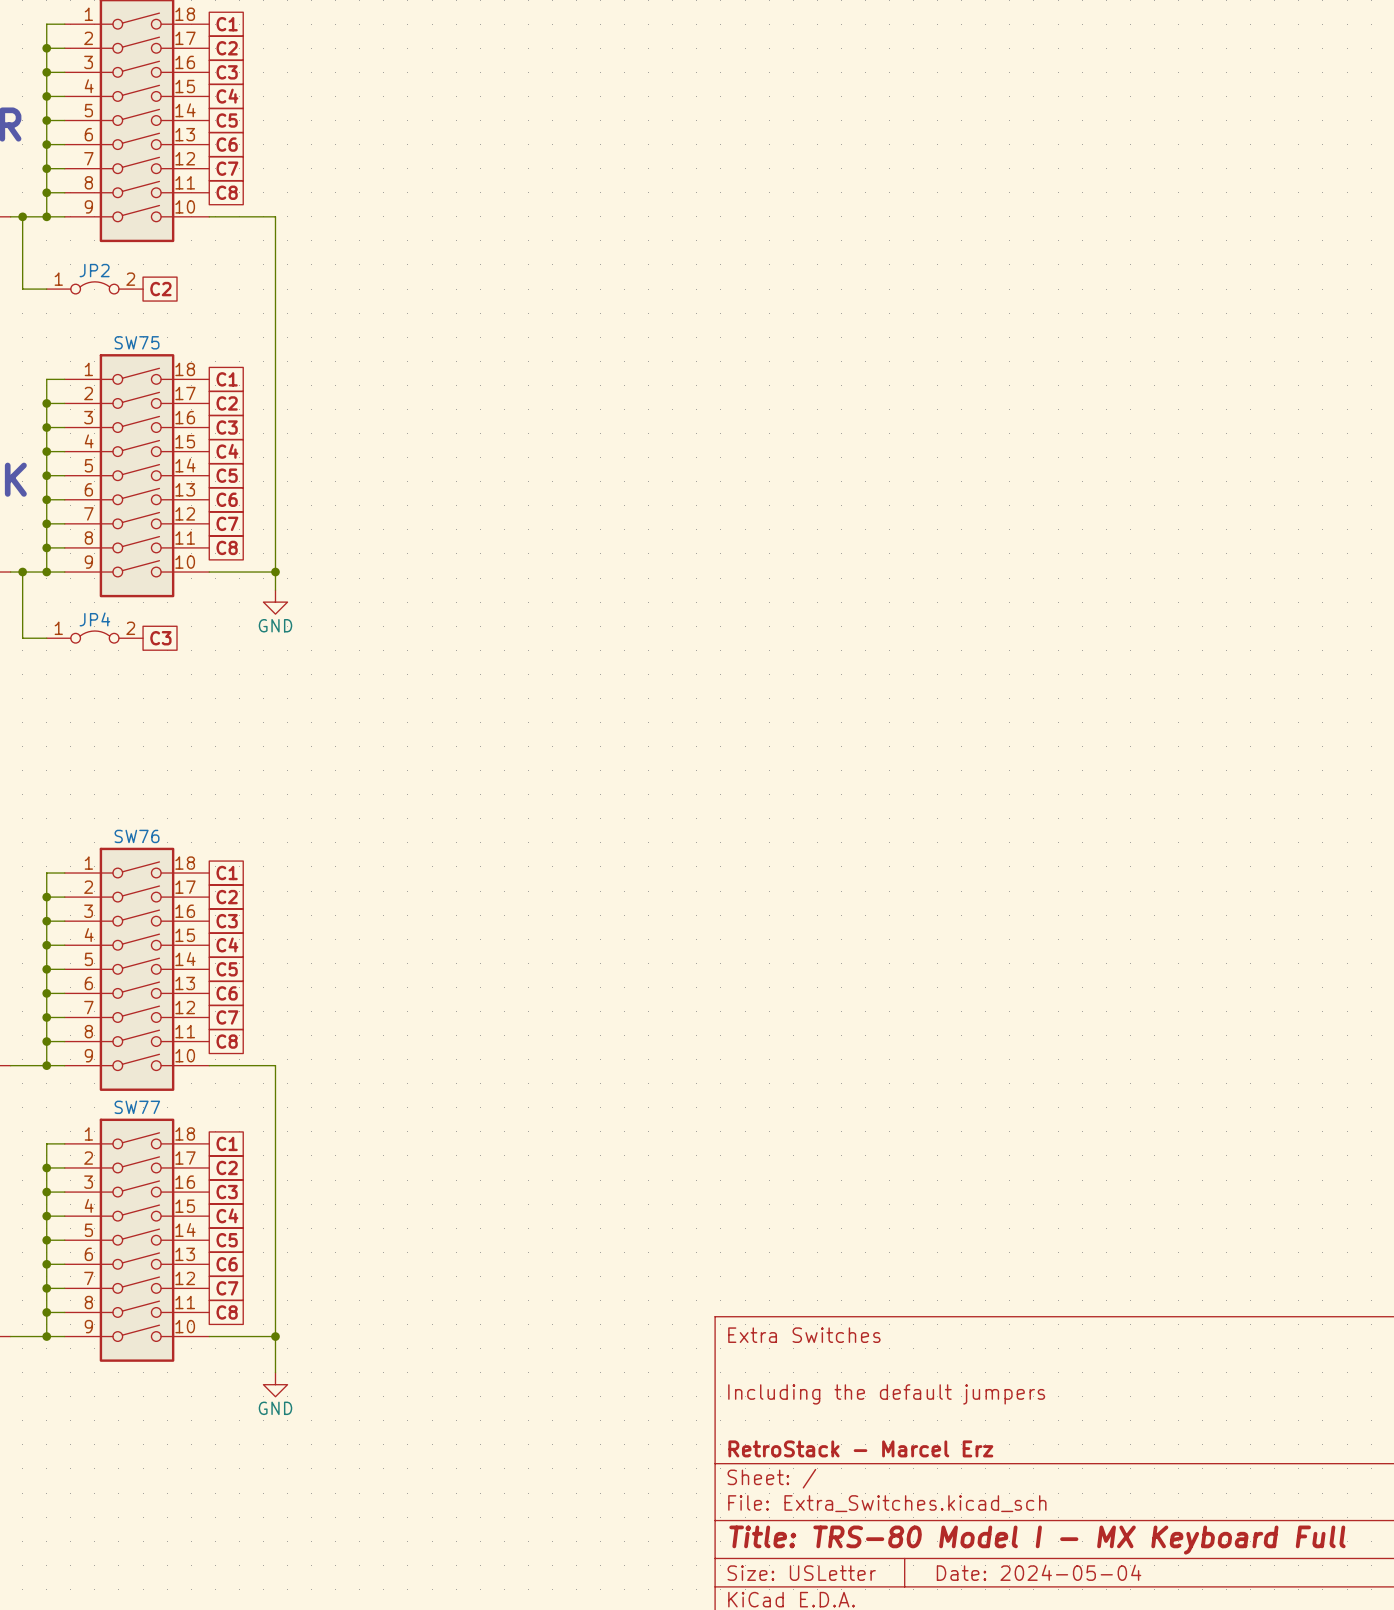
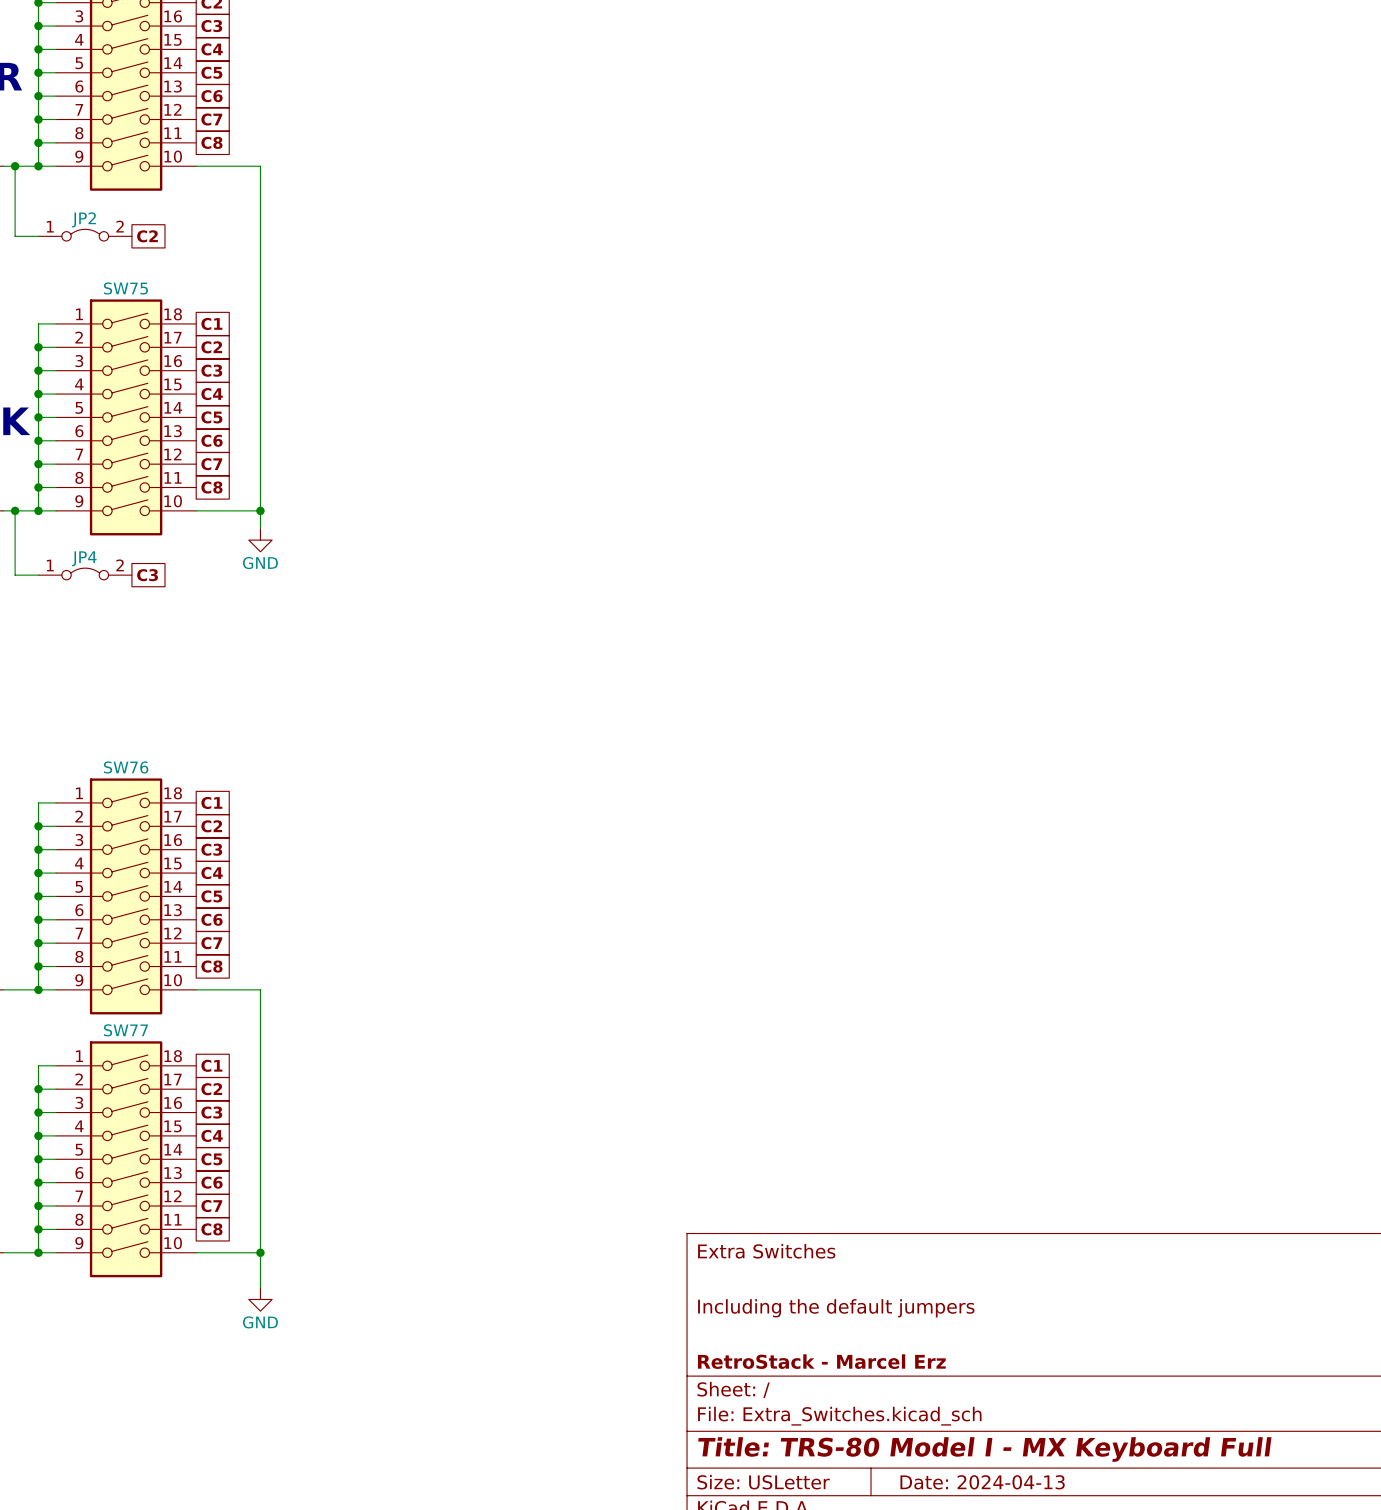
title block: Date: 2024-05-04 (1039, 1572) -> Date: 2024-04-13 (982, 1482)

